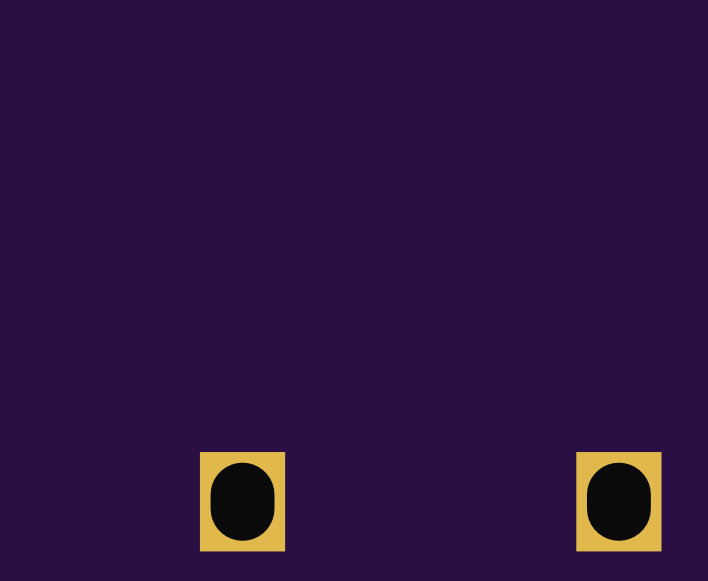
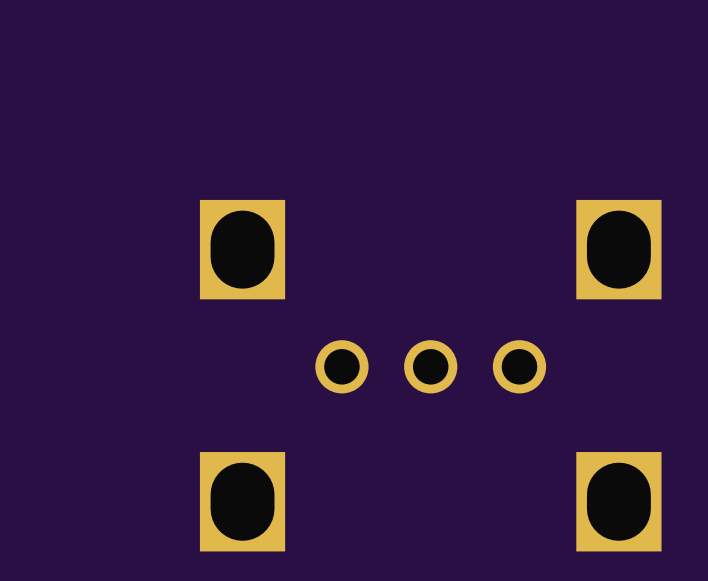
part: none -> (430, 296)

